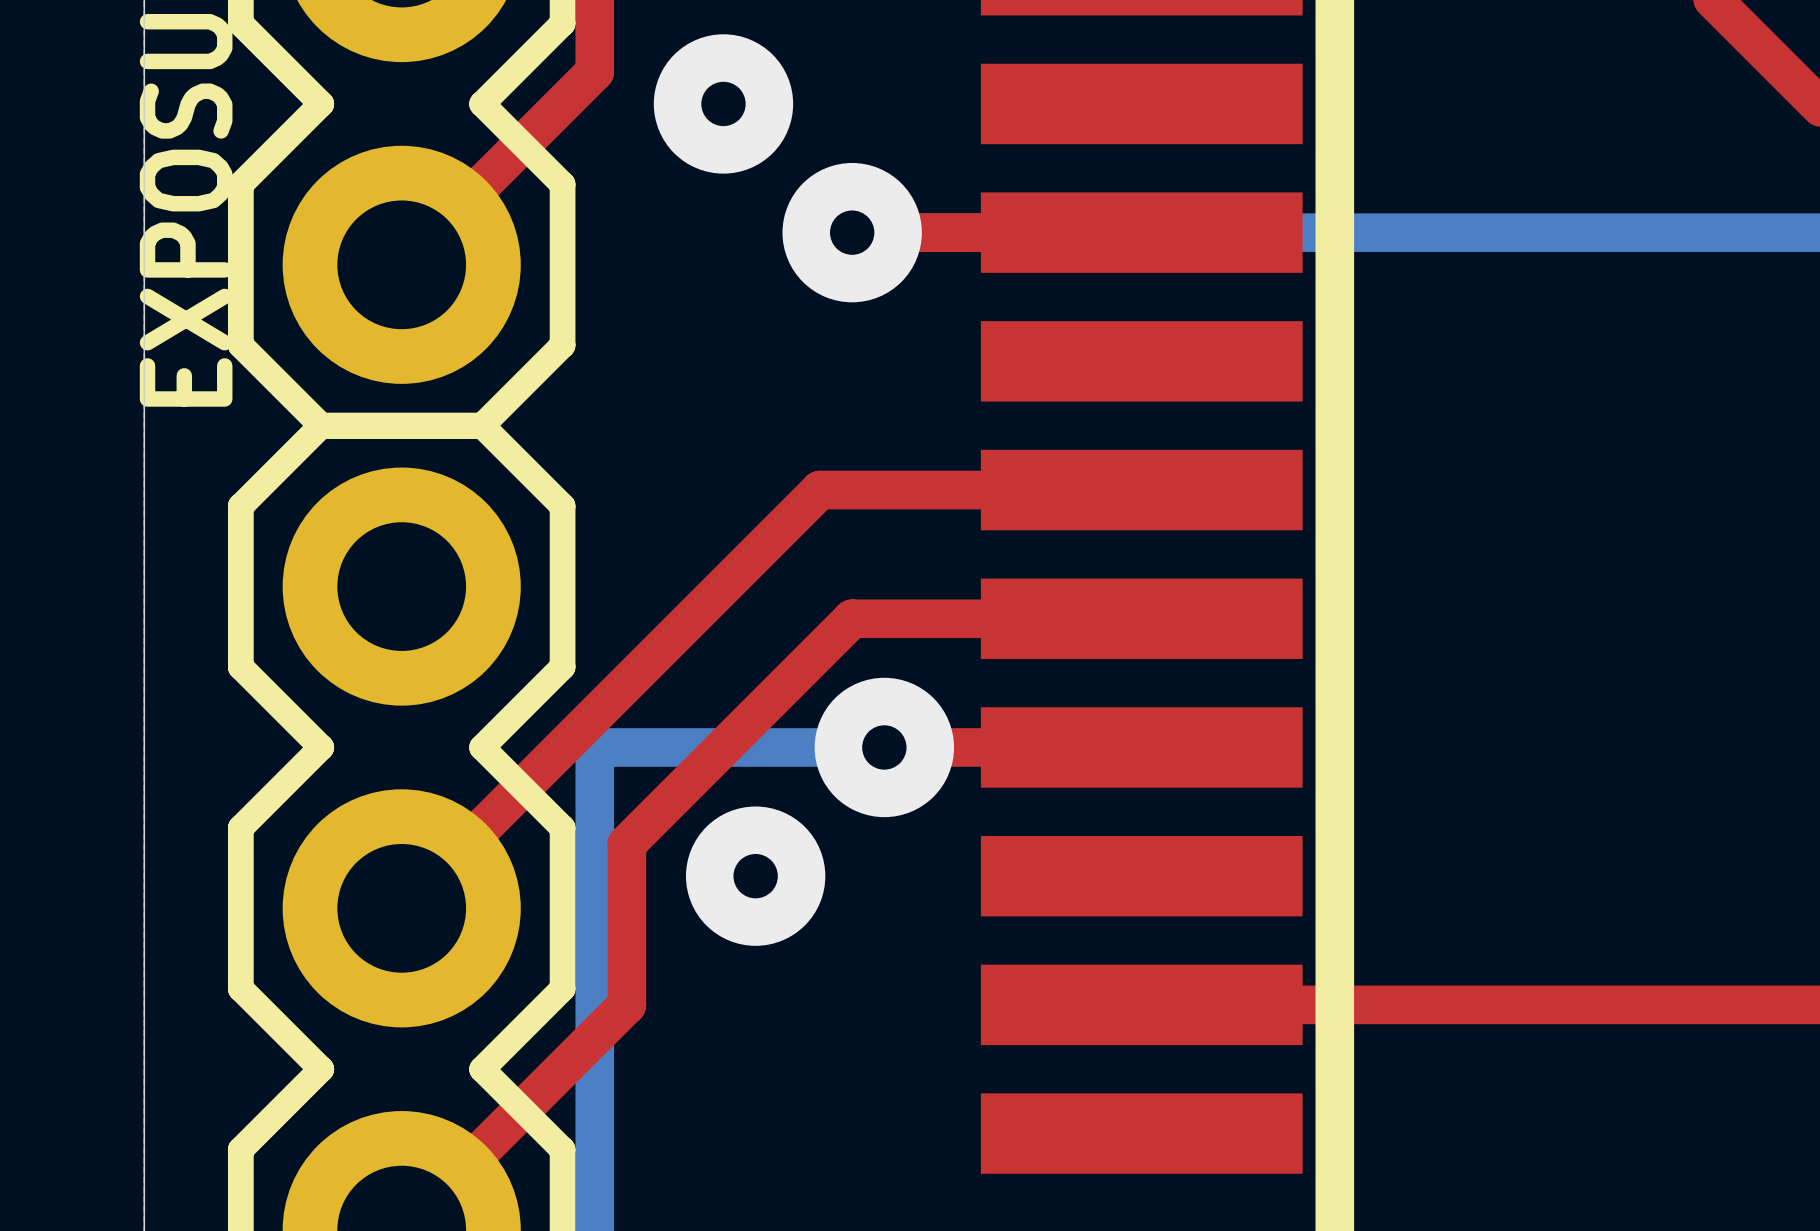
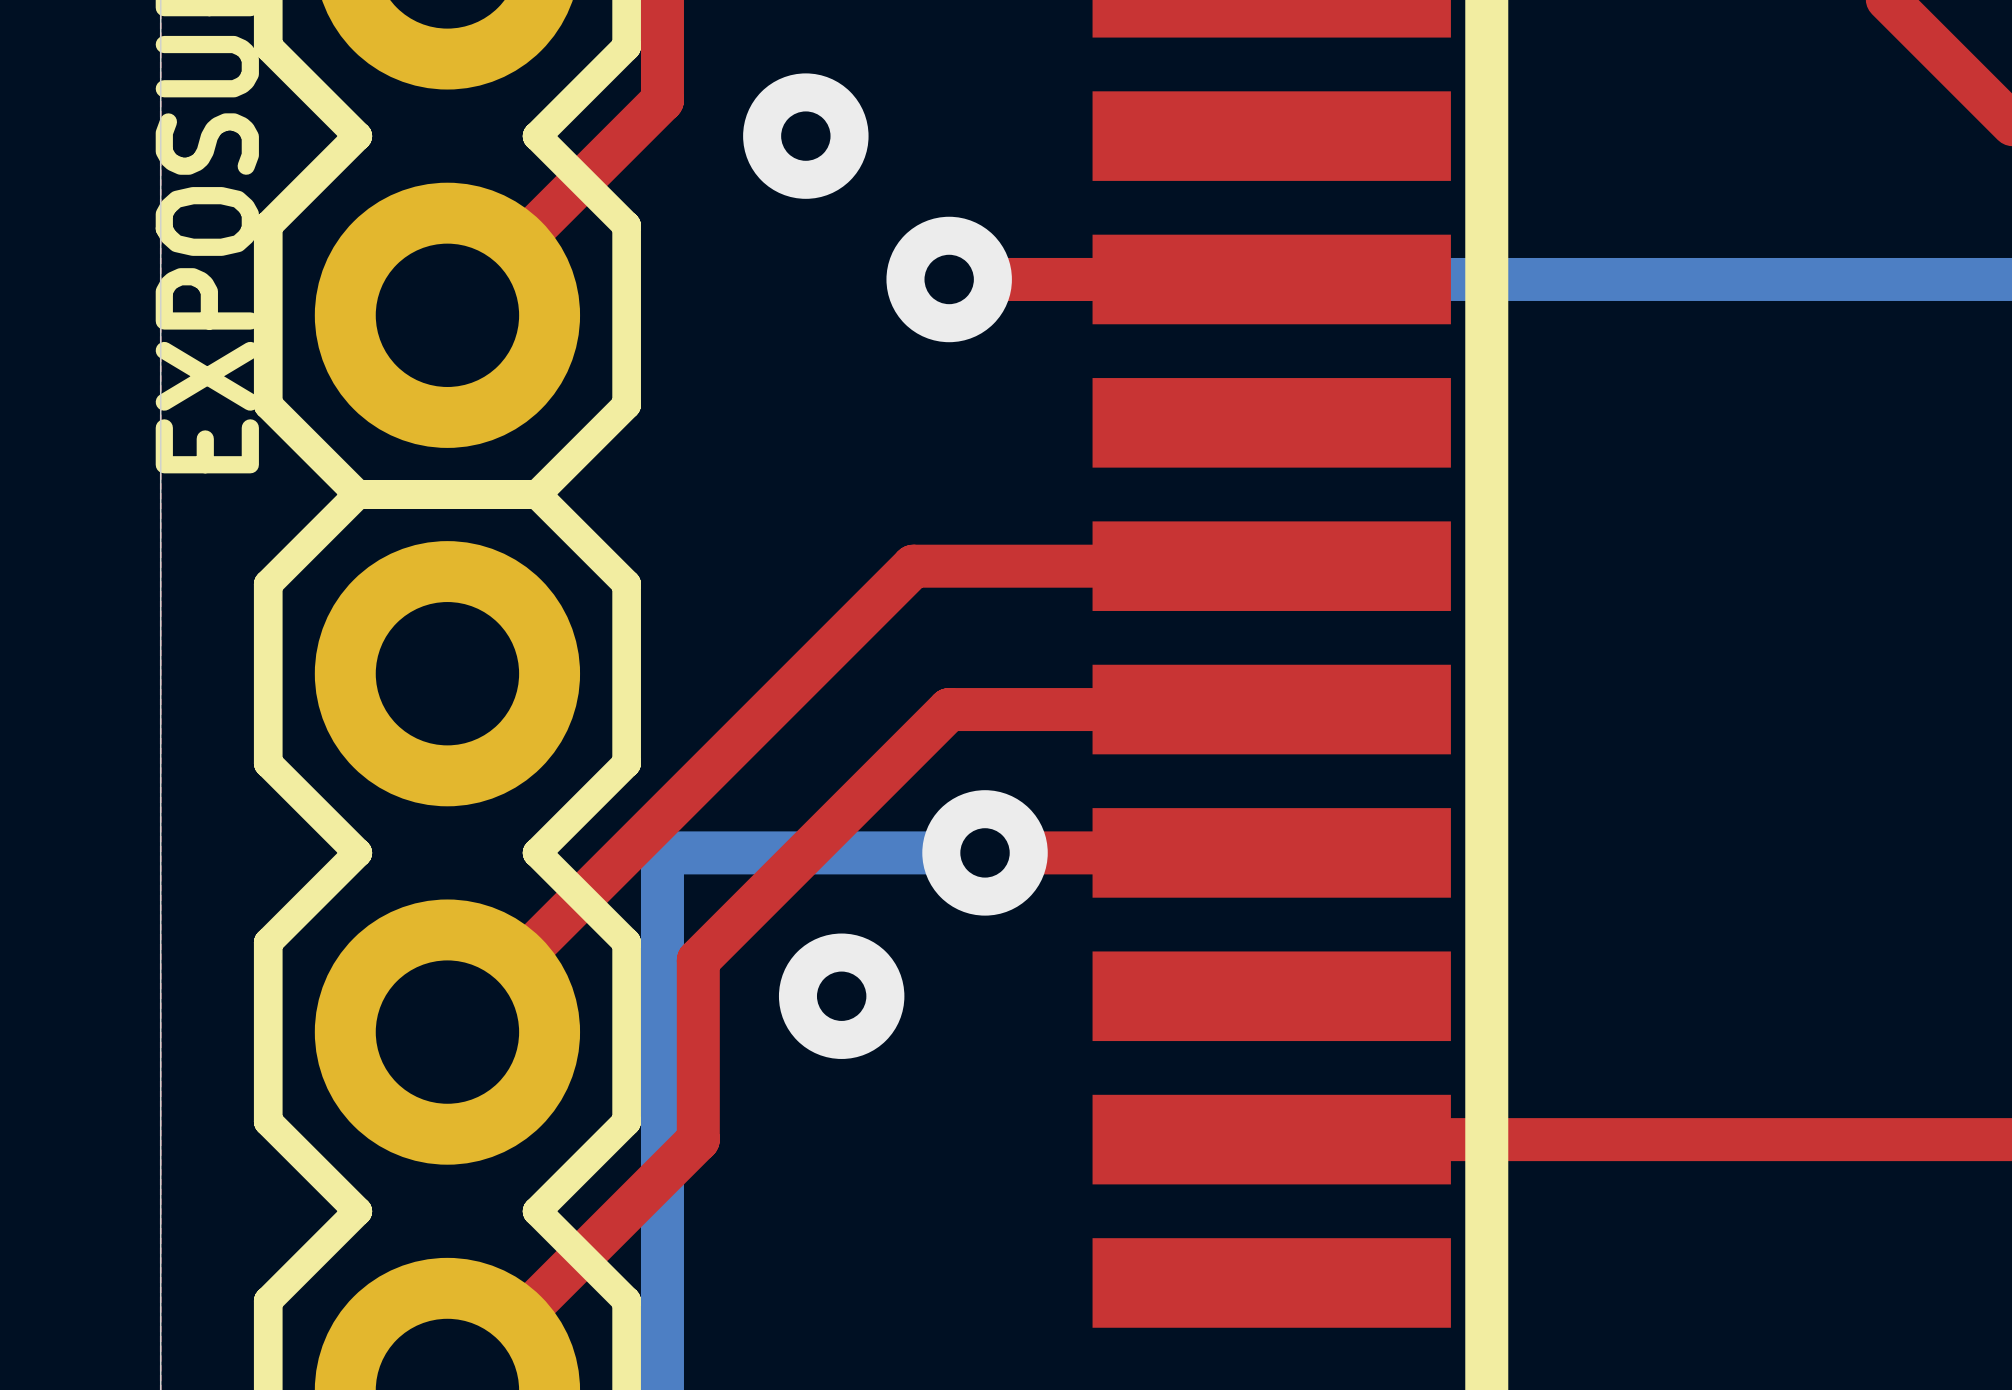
via size: [653, 34, 794, 174] -> [743, 73, 869, 199]
via size: [782, 162, 922, 303] -> [886, 216, 1012, 343]
via size: [814, 677, 955, 818] -> [922, 790, 1048, 916]
via size: [685, 806, 826, 946] -> [778, 933, 905, 1059]

